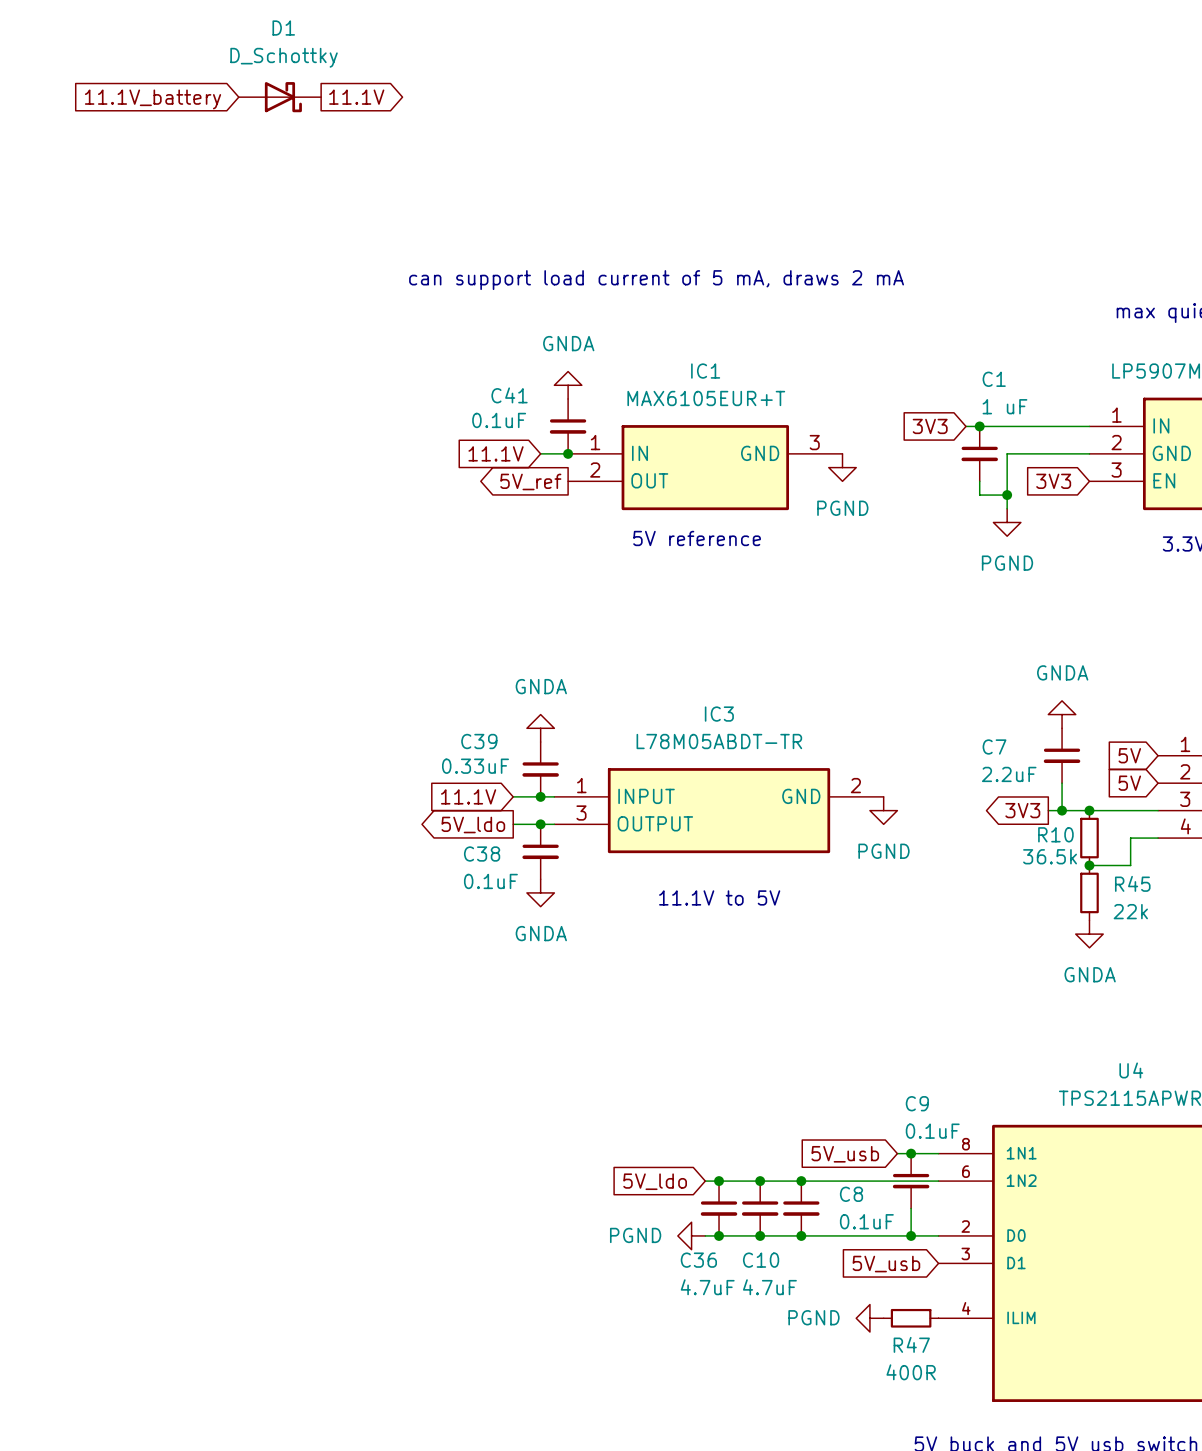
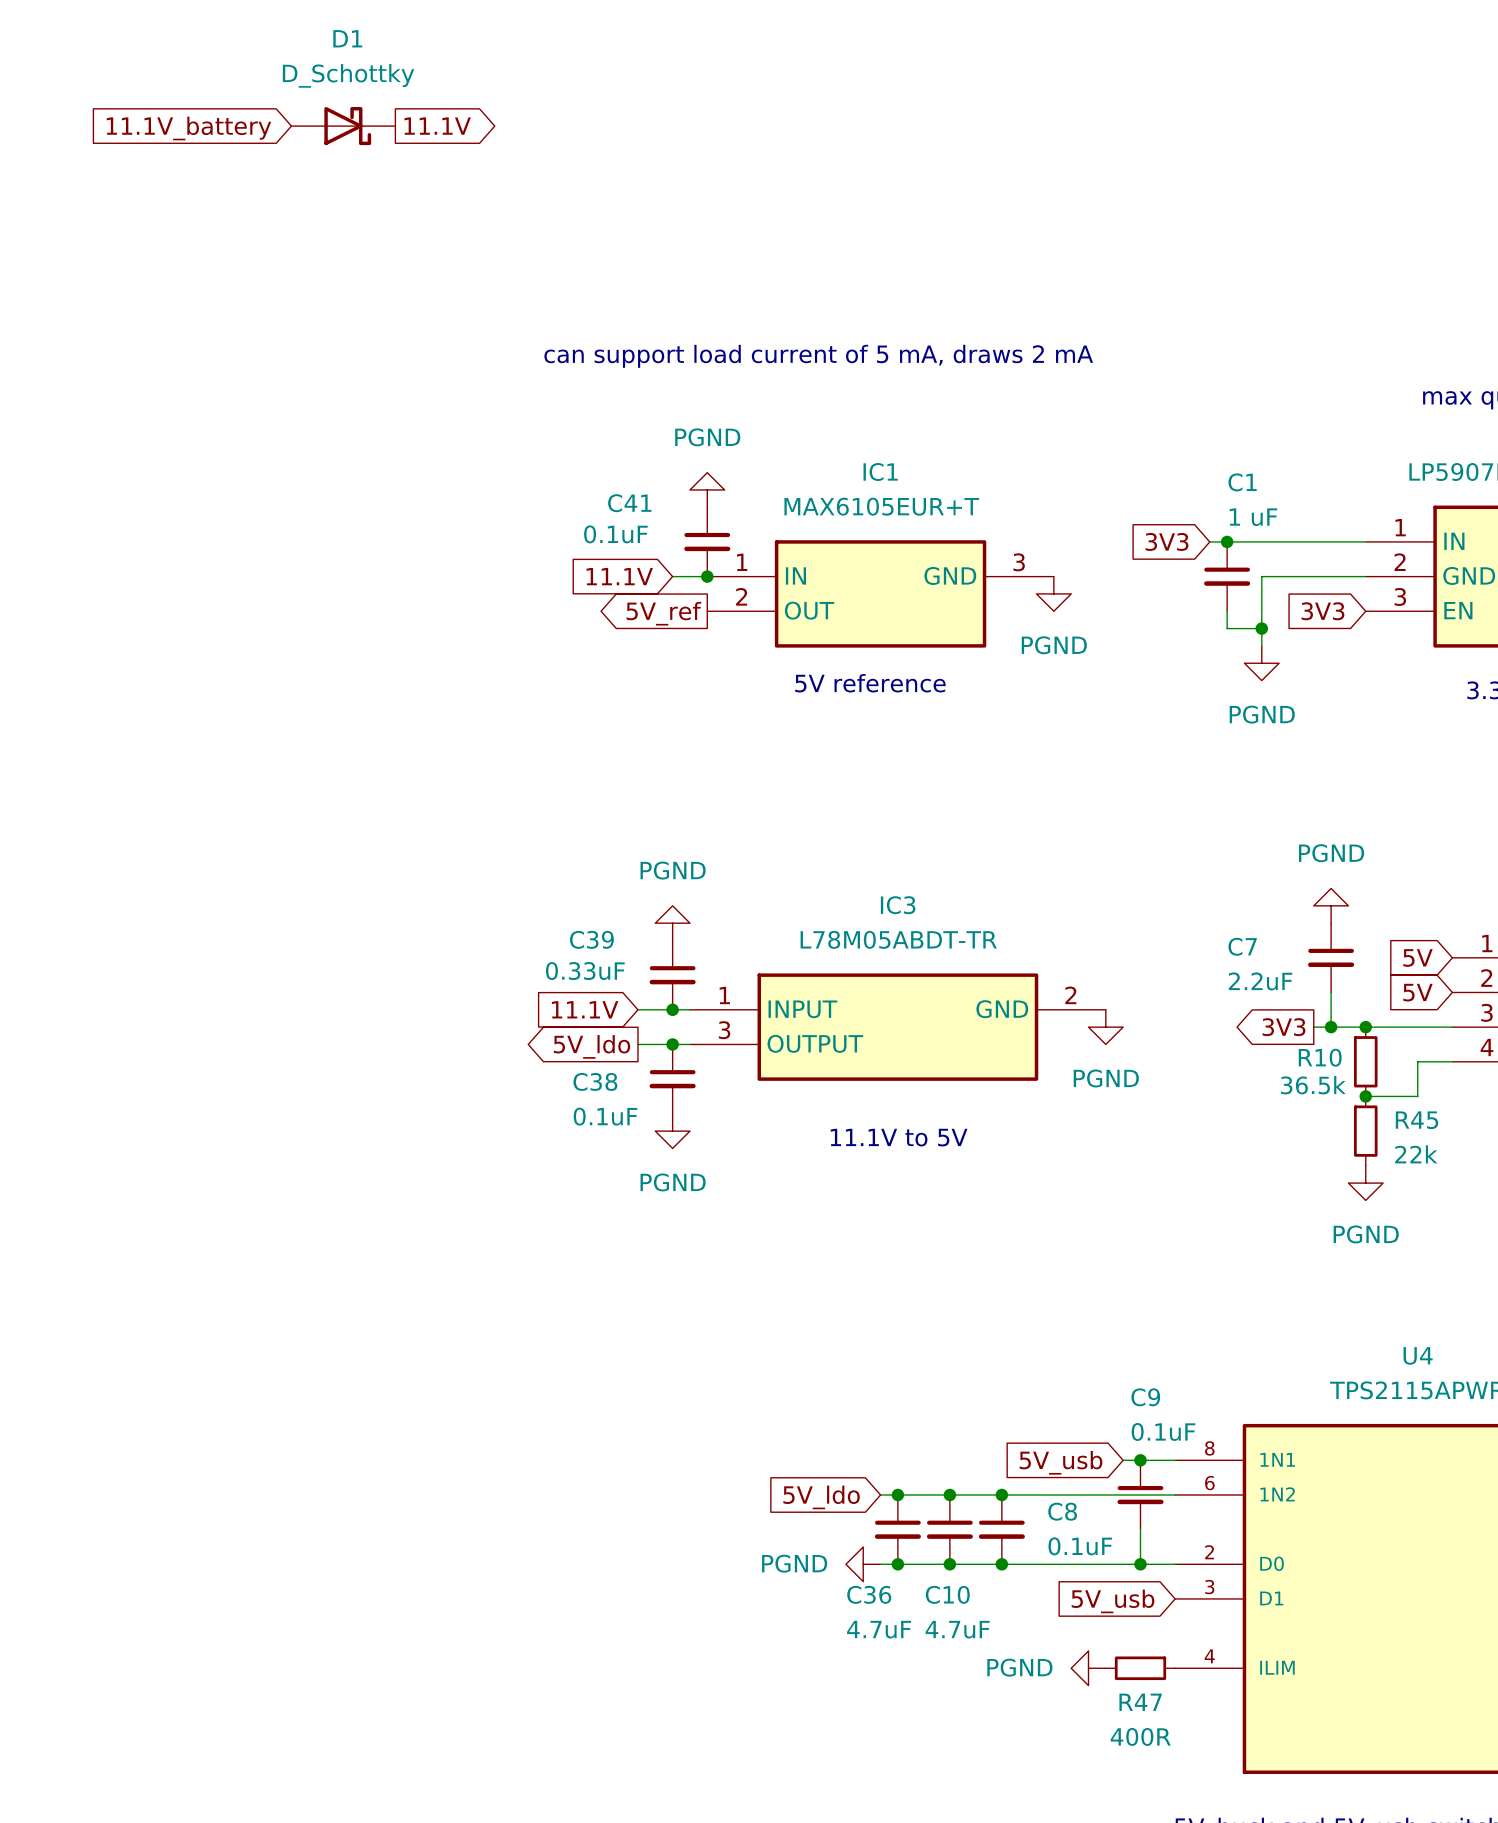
power symbol: GNDA (568, 385) -> PGND (707, 489)
power symbol: GNDA (1062, 714) -> PGND (1331, 905)
power symbol: GNDA (540, 728) -> PGND (672, 923)
power symbol: GNDA (540, 892) -> PGND (672, 1131)
power symbol: GNDA (1089, 934) -> PGND (1365, 1183)

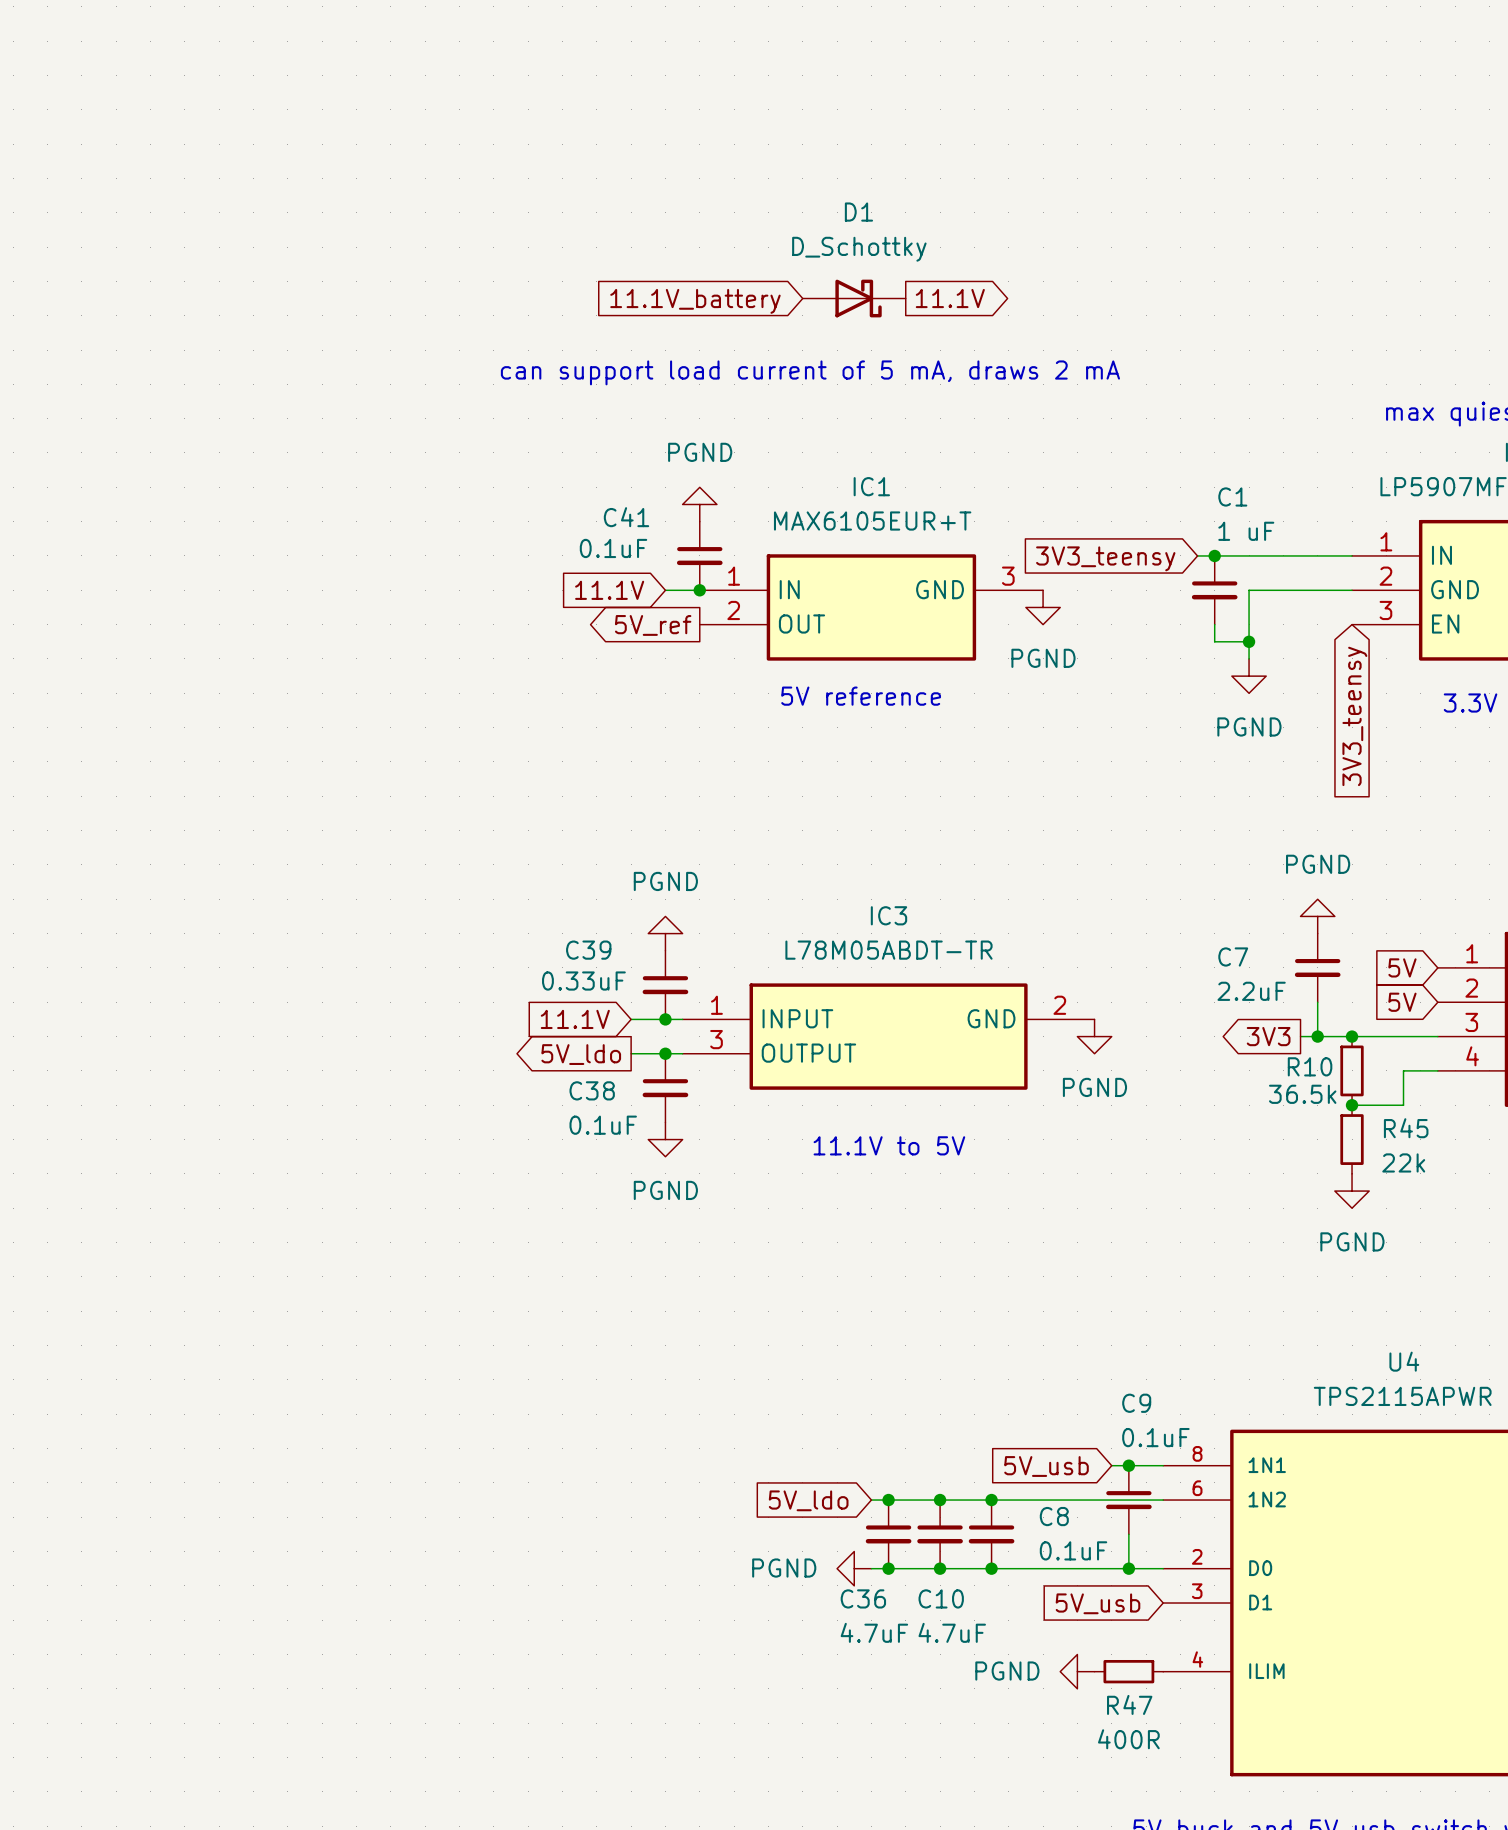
D1 position: (343, 126) -> (854, 298)
global label: 11.1V (437, 126) -> none
global label: 11.1V_battery (188, 128) -> none
global label: none -> 11.1V (950, 298)
global label: none -> 11.1V_battery (695, 301)
global label: 3V3 (1167, 541) -> 3V3_teensy (1105, 558)
global label: 3V3 (1322, 611) -> 3V3_teensy (1354, 716)

